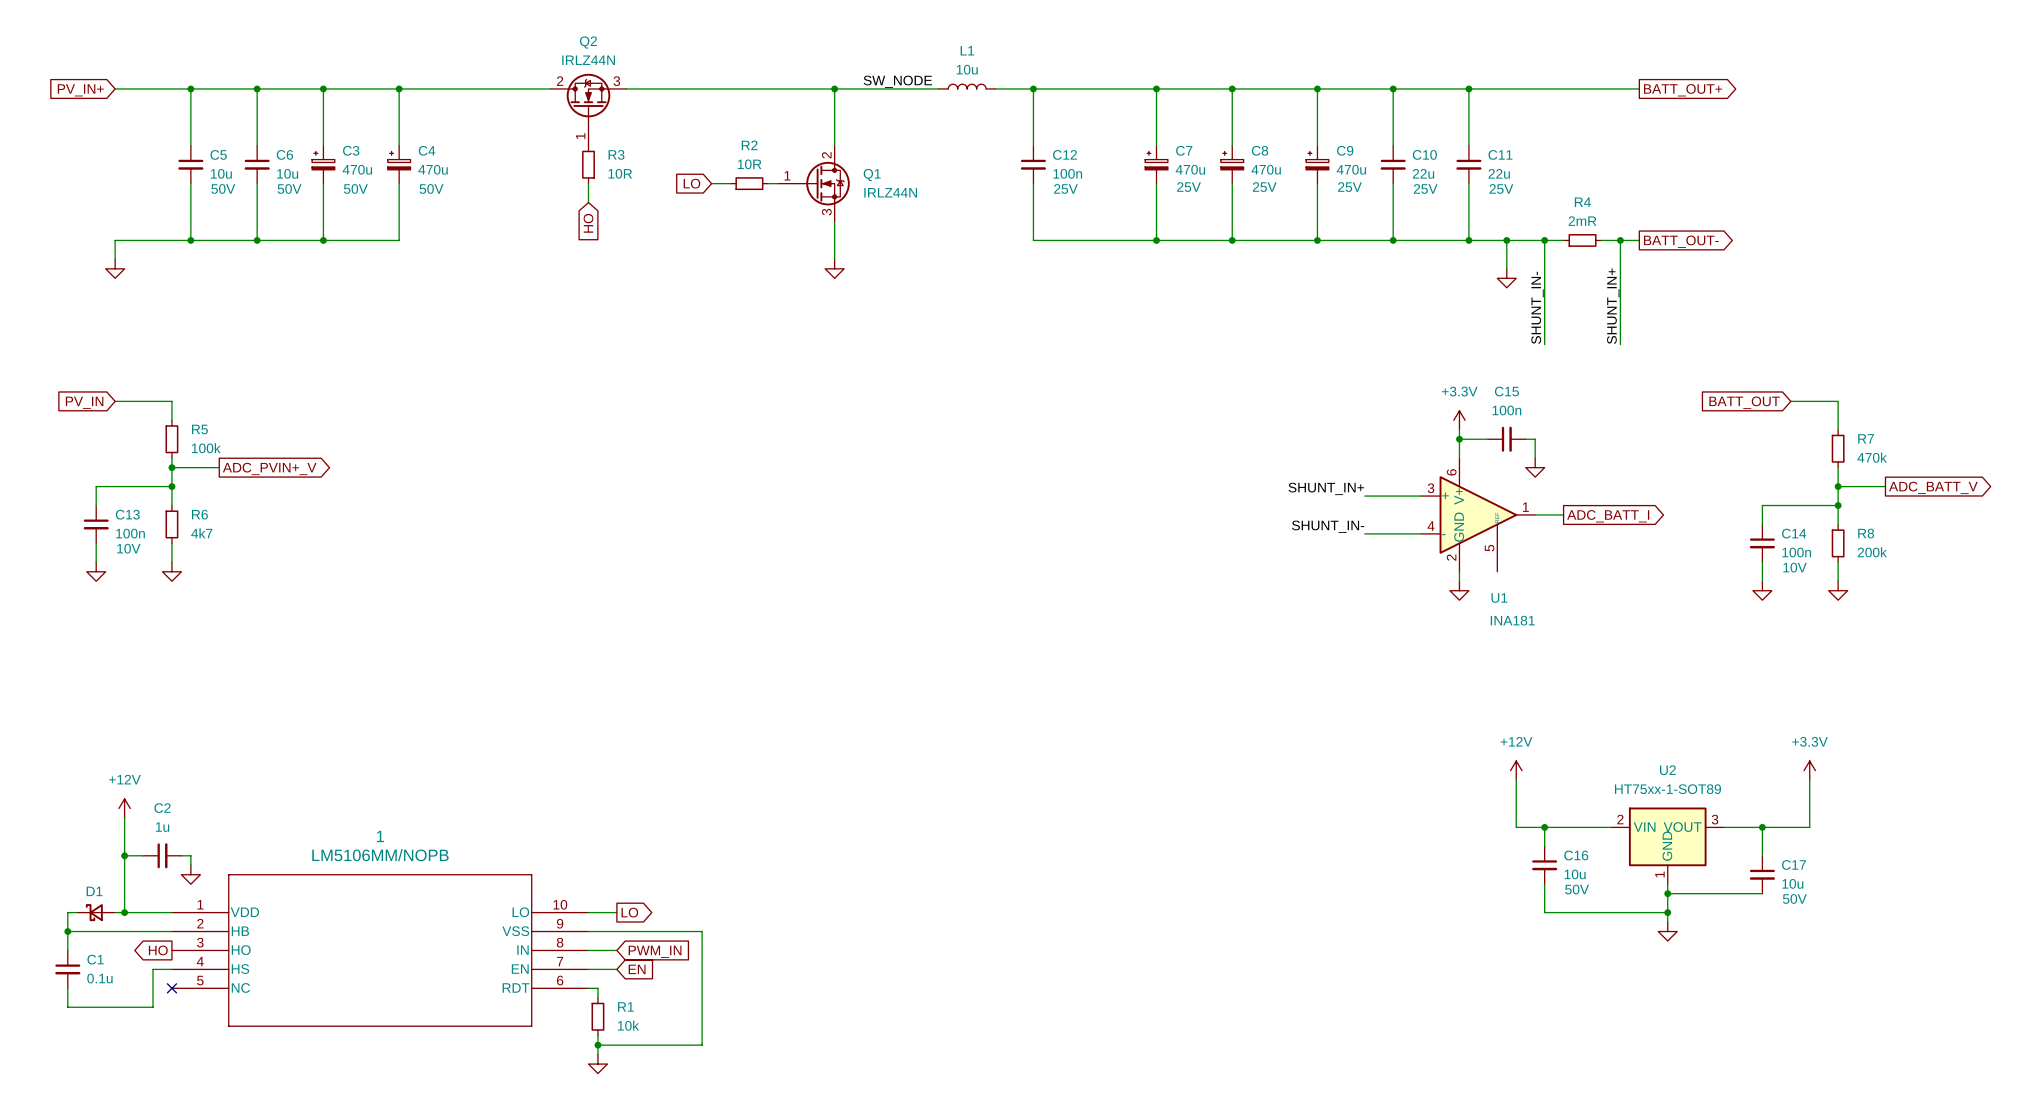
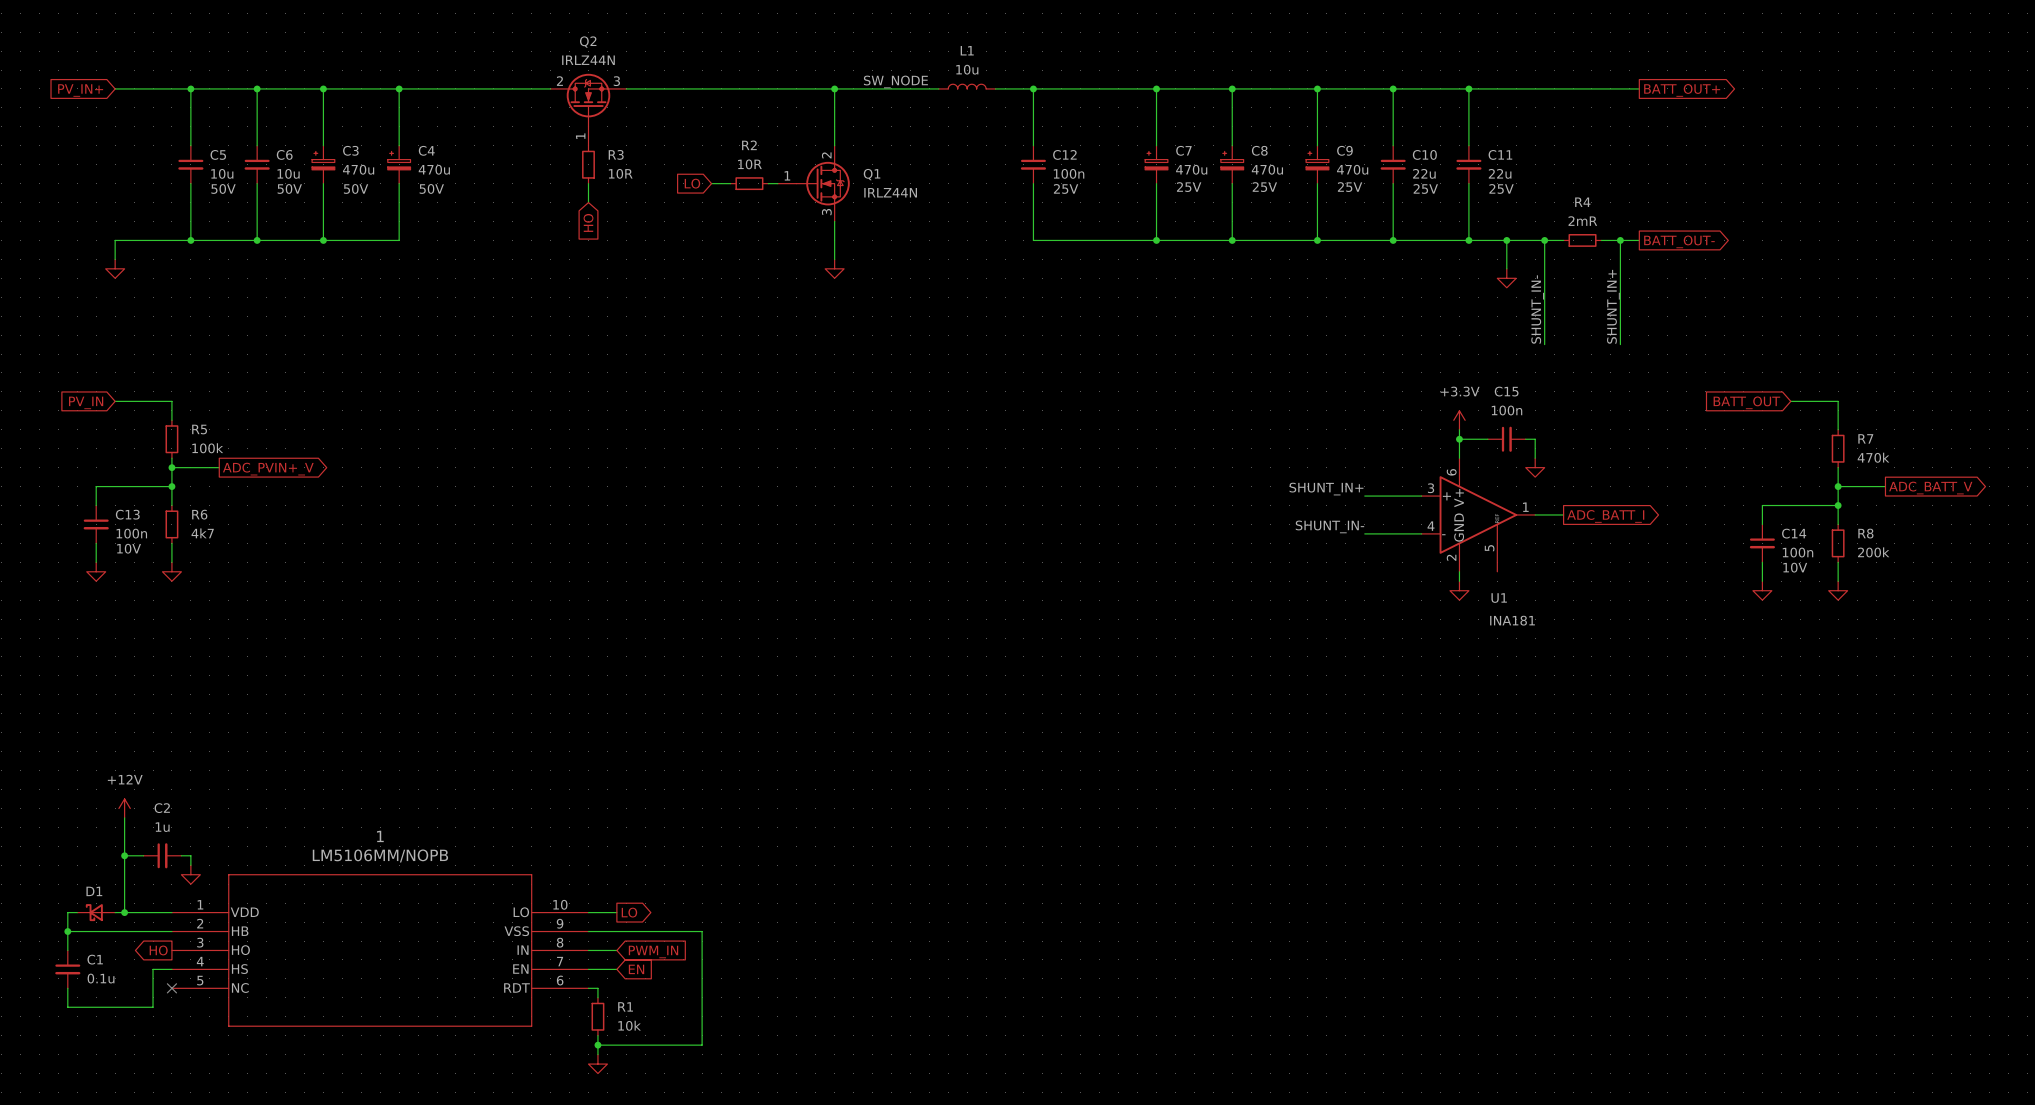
power symbol: +12V (1516, 770) -> none
power symbol: +3.3V (1809, 770) -> none
wire: (1516, 780) (1516, 827) (1610, 827) -> none
wire: (1809, 780) (1809, 827) (1724, 827) -> none
wire: (1544, 827) (1544, 846) -> none
junction: (1544, 827) -> none
wire: (1762, 827) (1762, 855) -> none
junction: (1762, 827) -> none
U2: HT75xx-1-SOT89 (1667, 845) -> none
C16: 10u (1544, 865) -> none
C17: 10u (1762, 874) -> none
wire: (1544, 884) (1544, 912) (1667, 912) -> none
wire: (1667, 884) (1667, 922) -> none
wire: (1667, 893) (1762, 893) -> none
junction: (1667, 893) -> none
junction: (1667, 912) -> none
power symbol: (1667, 931) -> none

